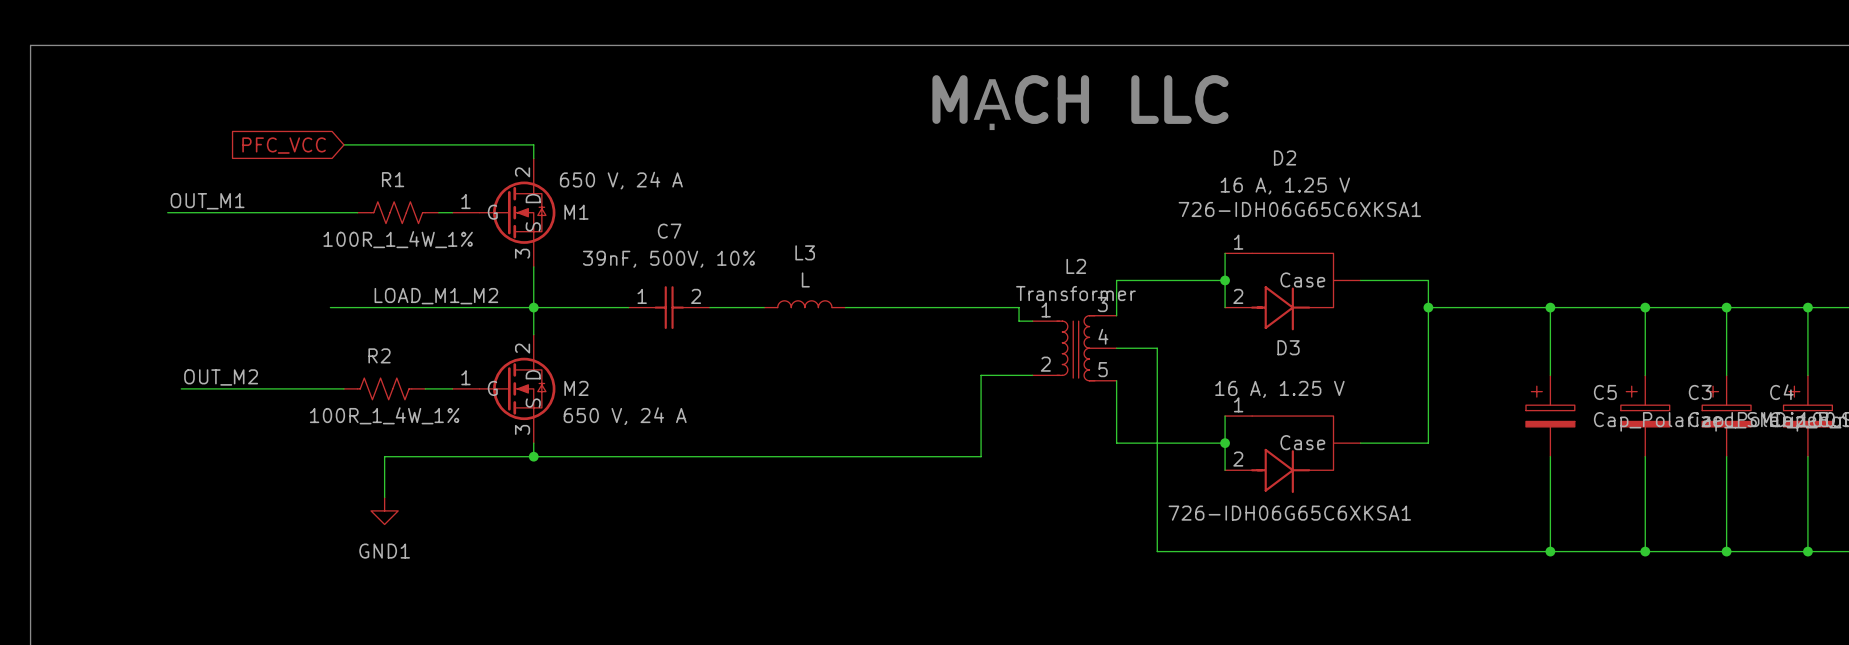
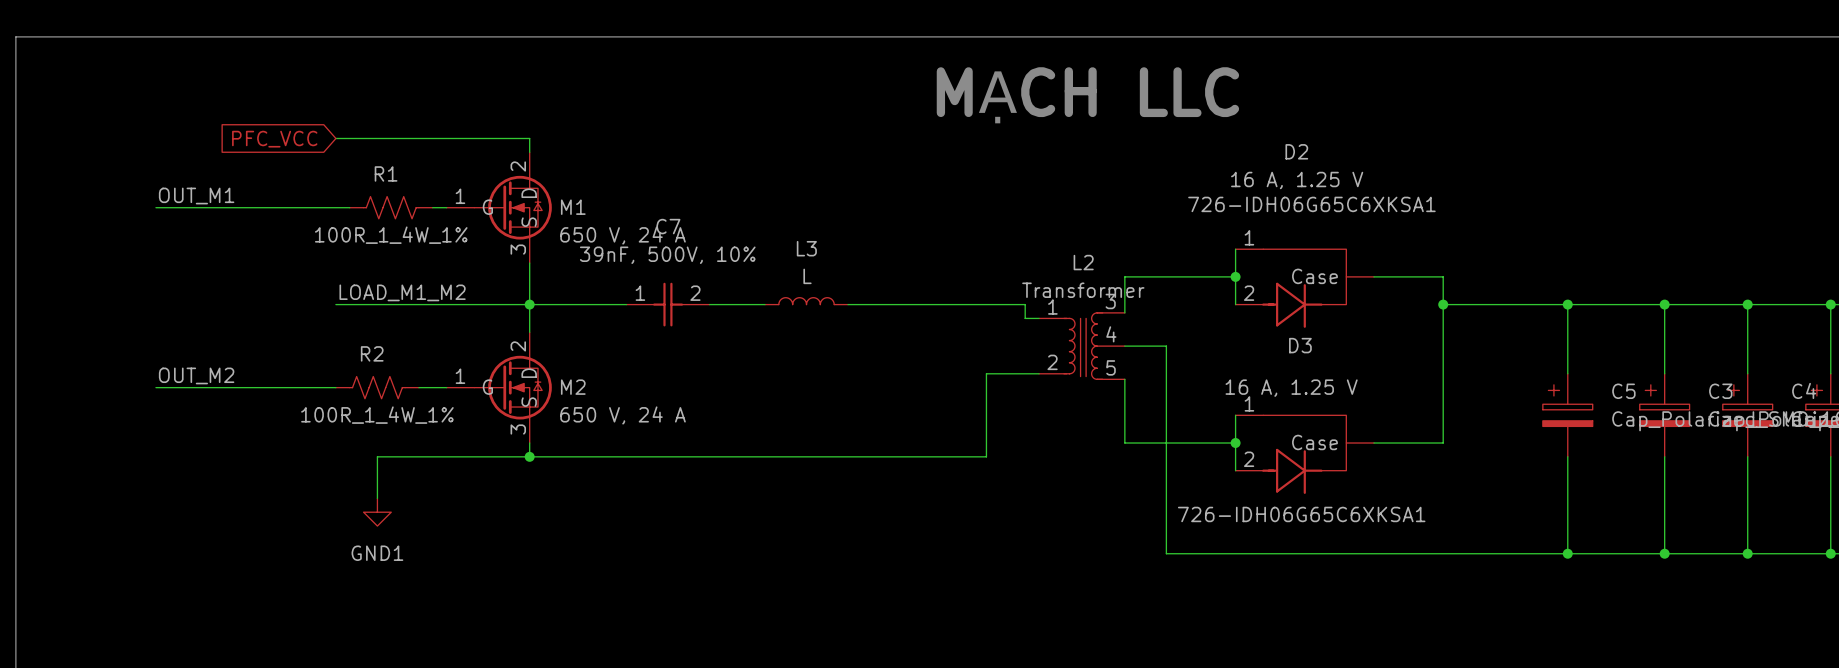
M1 value position: 650 V, 24 A (621, 180) -> 650 V, 24 A (623, 235)
label position: LOAD_M1_M2 (436, 296) -> LOAD_M1_M2 (402, 292)
wire: (330, 307) (343, 307) -> (155, 387) (169, 387)
label position: OUT_M2 (221, 377) -> OUT_M2 (196, 375)

